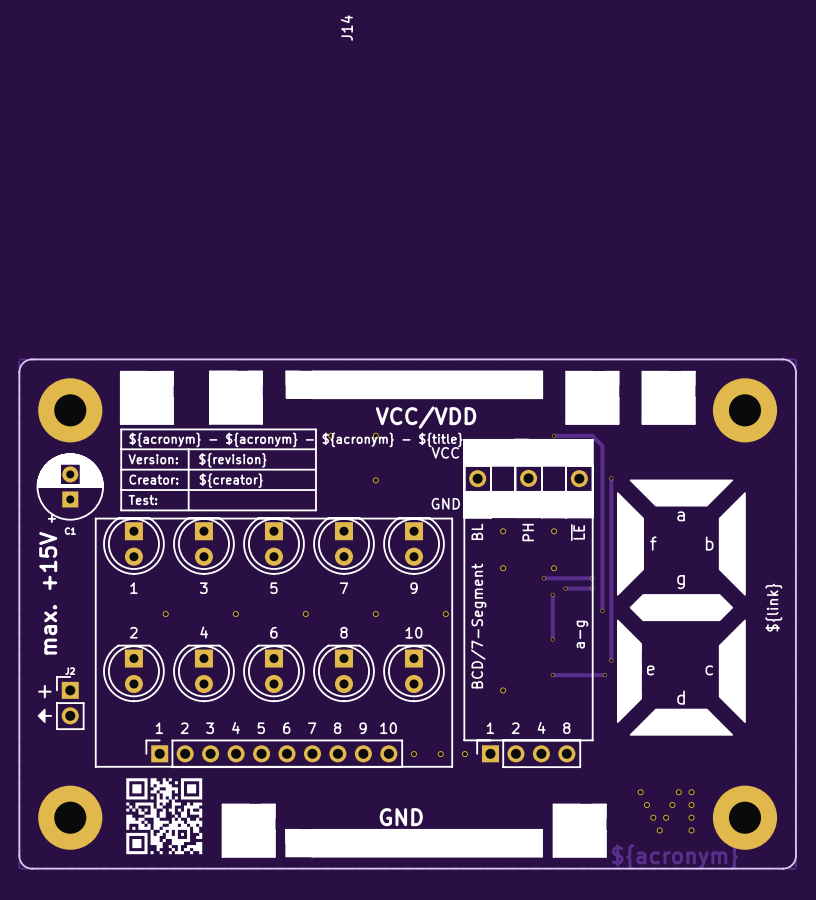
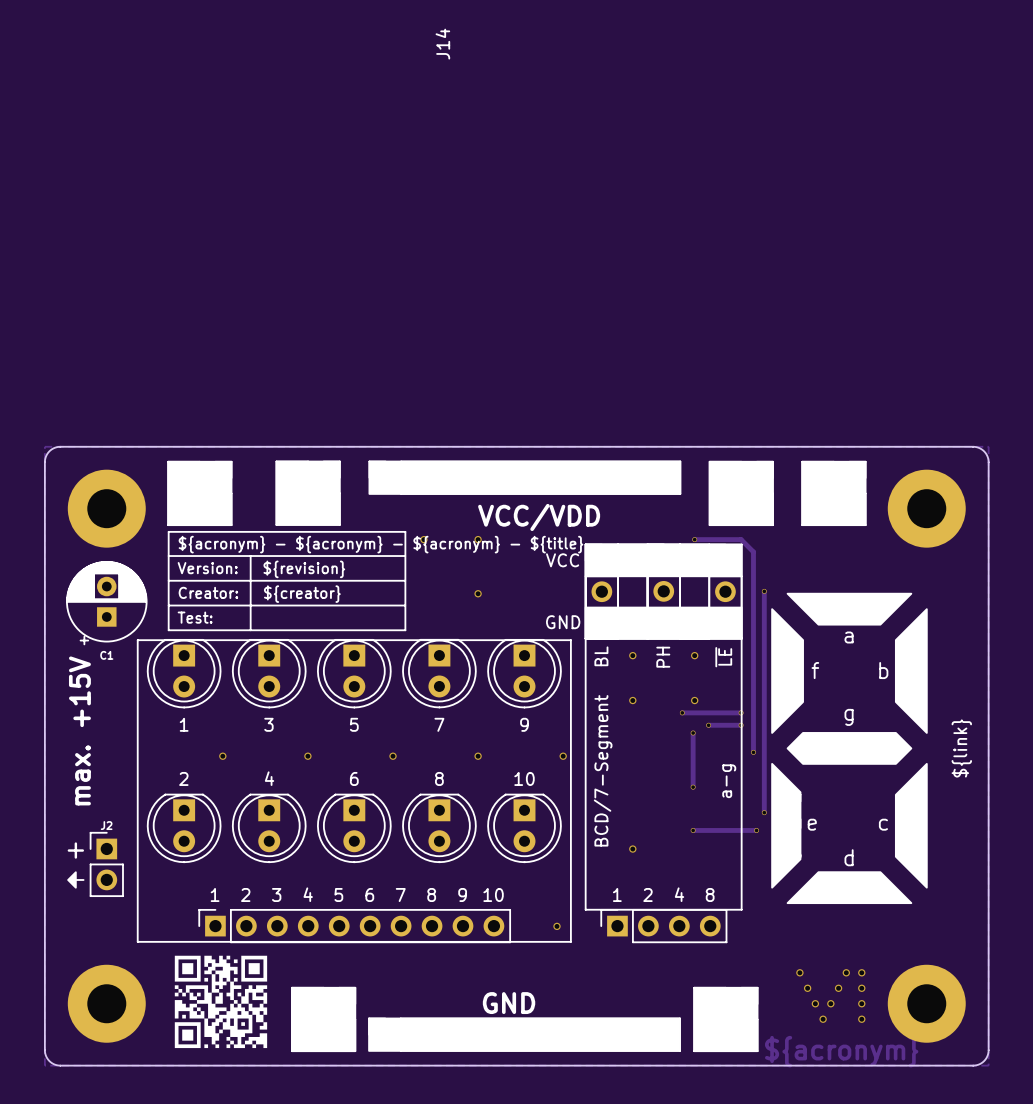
via: (414, 754) -> none
via: (464, 754) -> none

